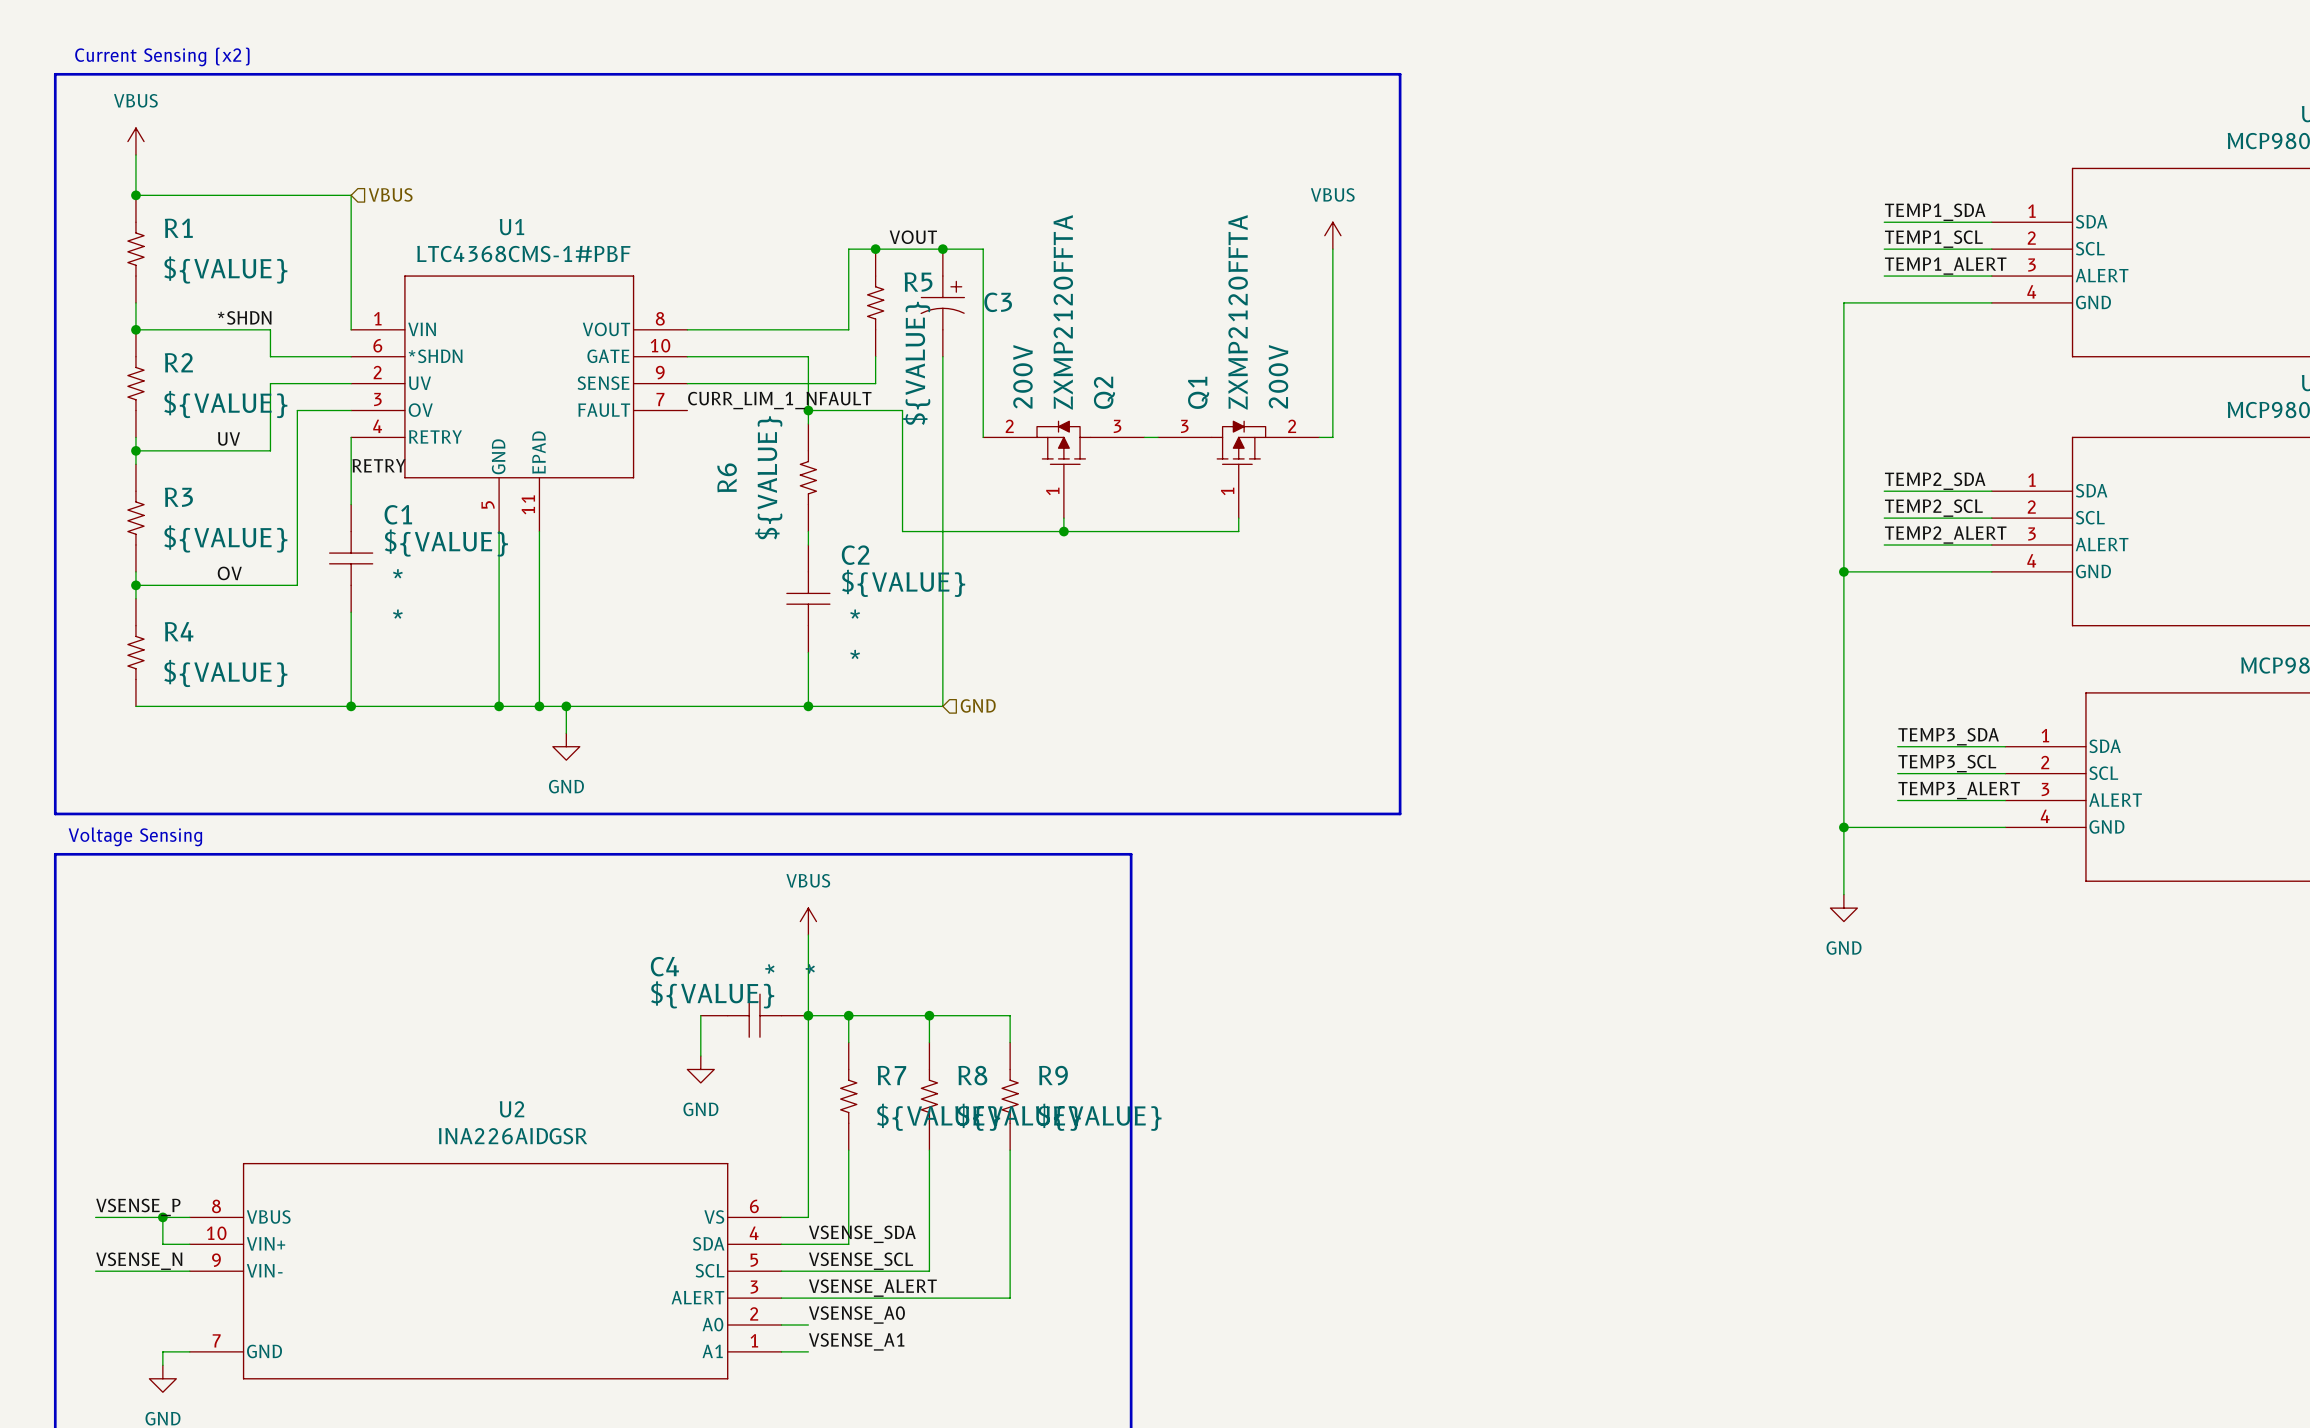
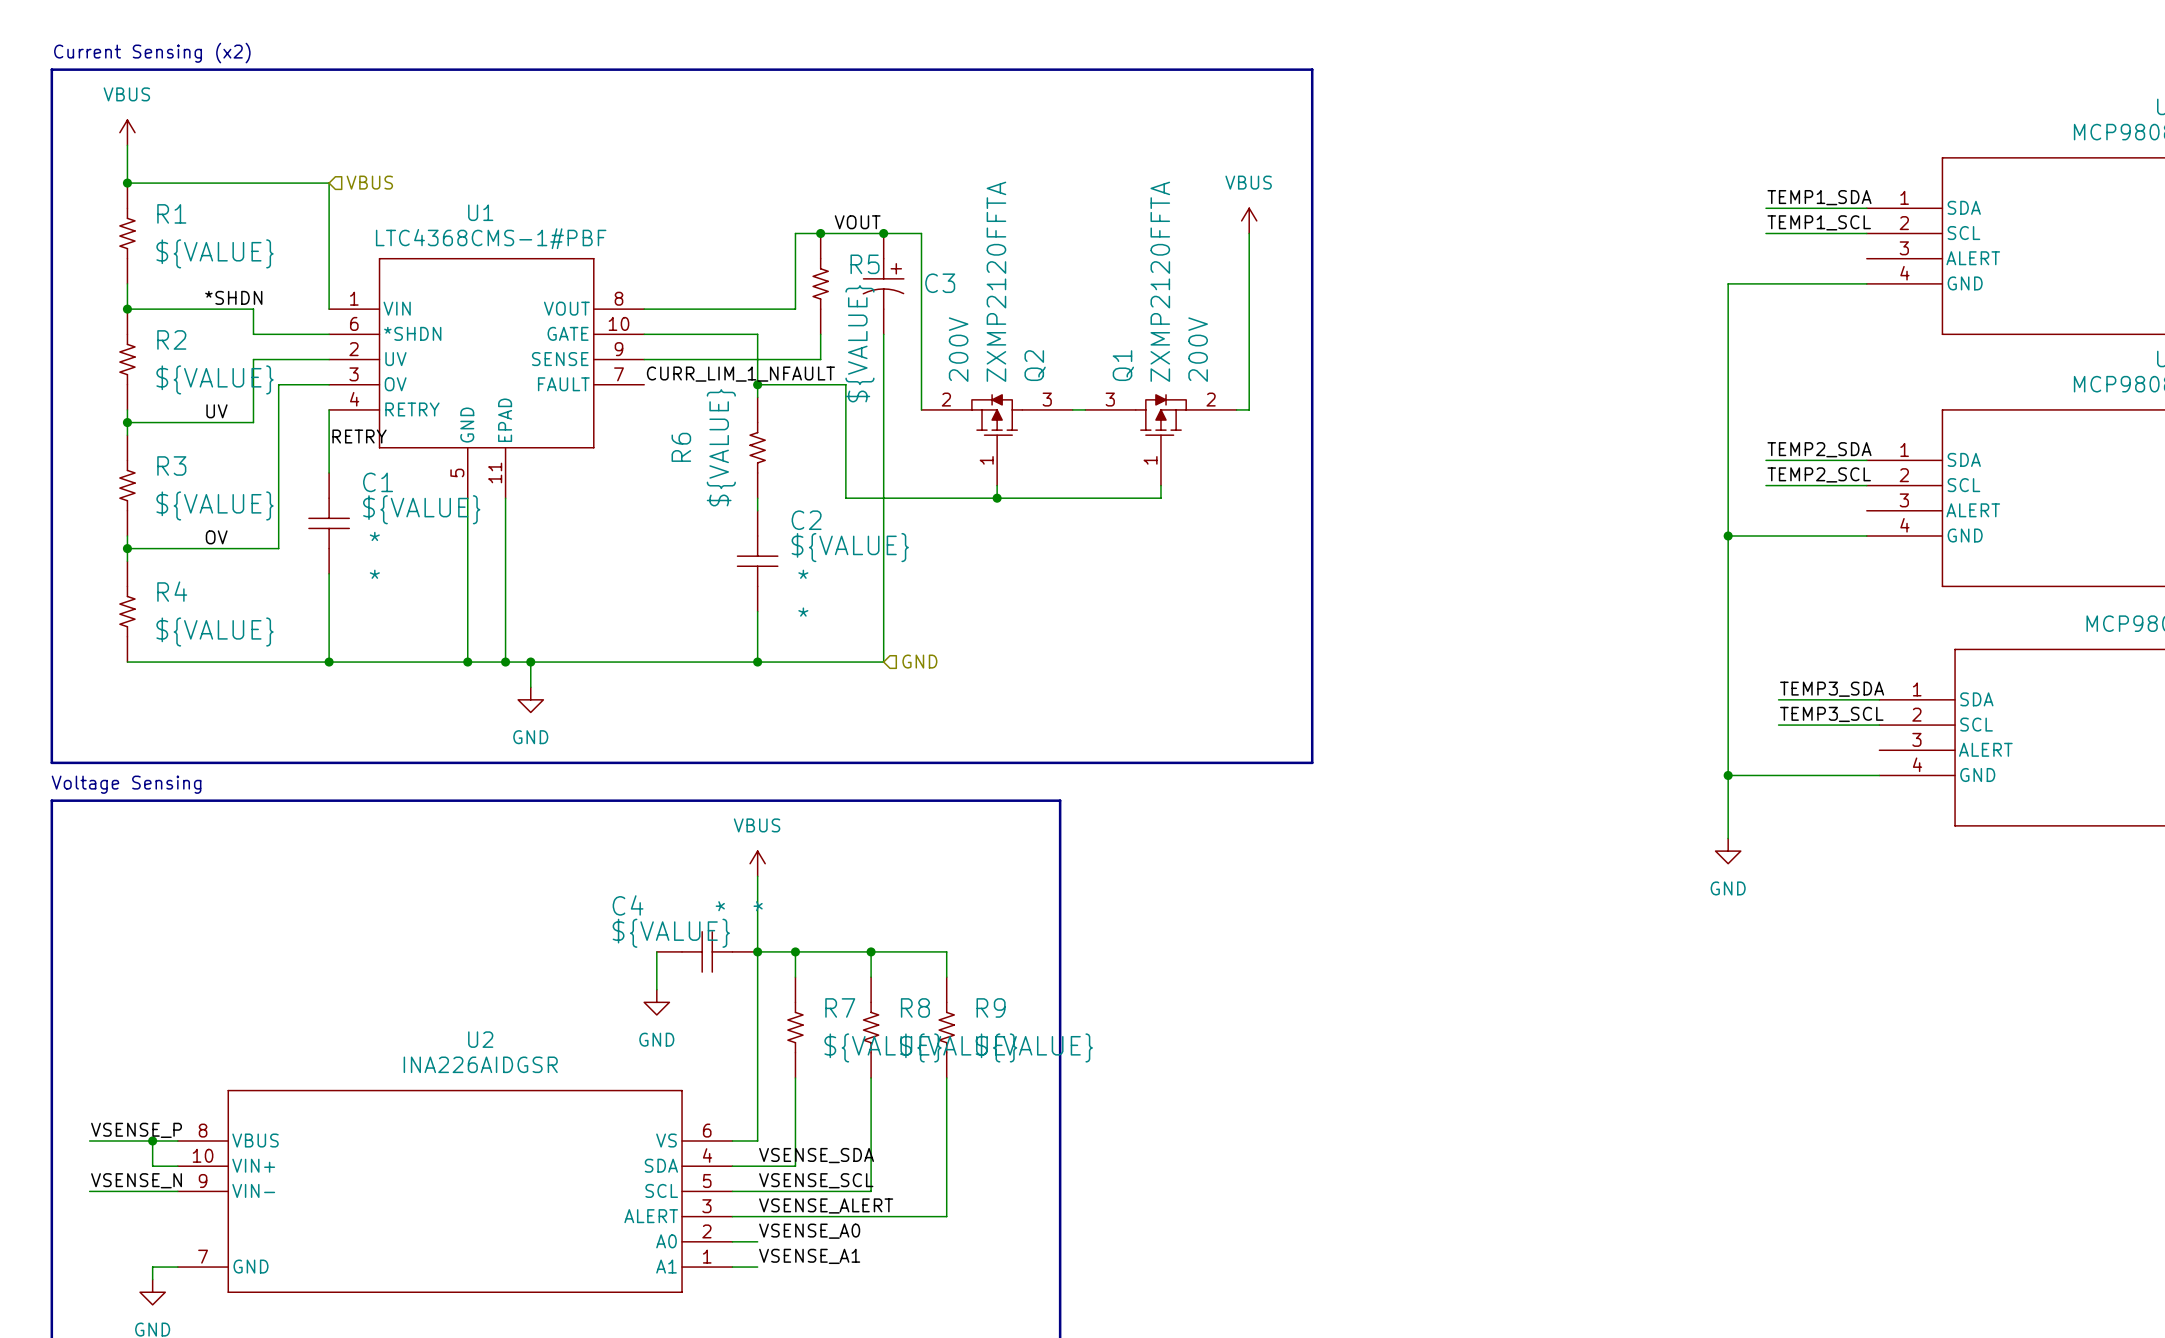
label: TEMP1_ALERT (1945, 266) -> none
wire: (1884, 276) (1991, 276) -> none
label: TEMP2_ALERT (1945, 535) -> none
wire: (1884, 545) (1991, 545) -> none
label: TEMP3_ALERT (1959, 790) -> none
wire: (1897, 800) (2005, 800) -> none

